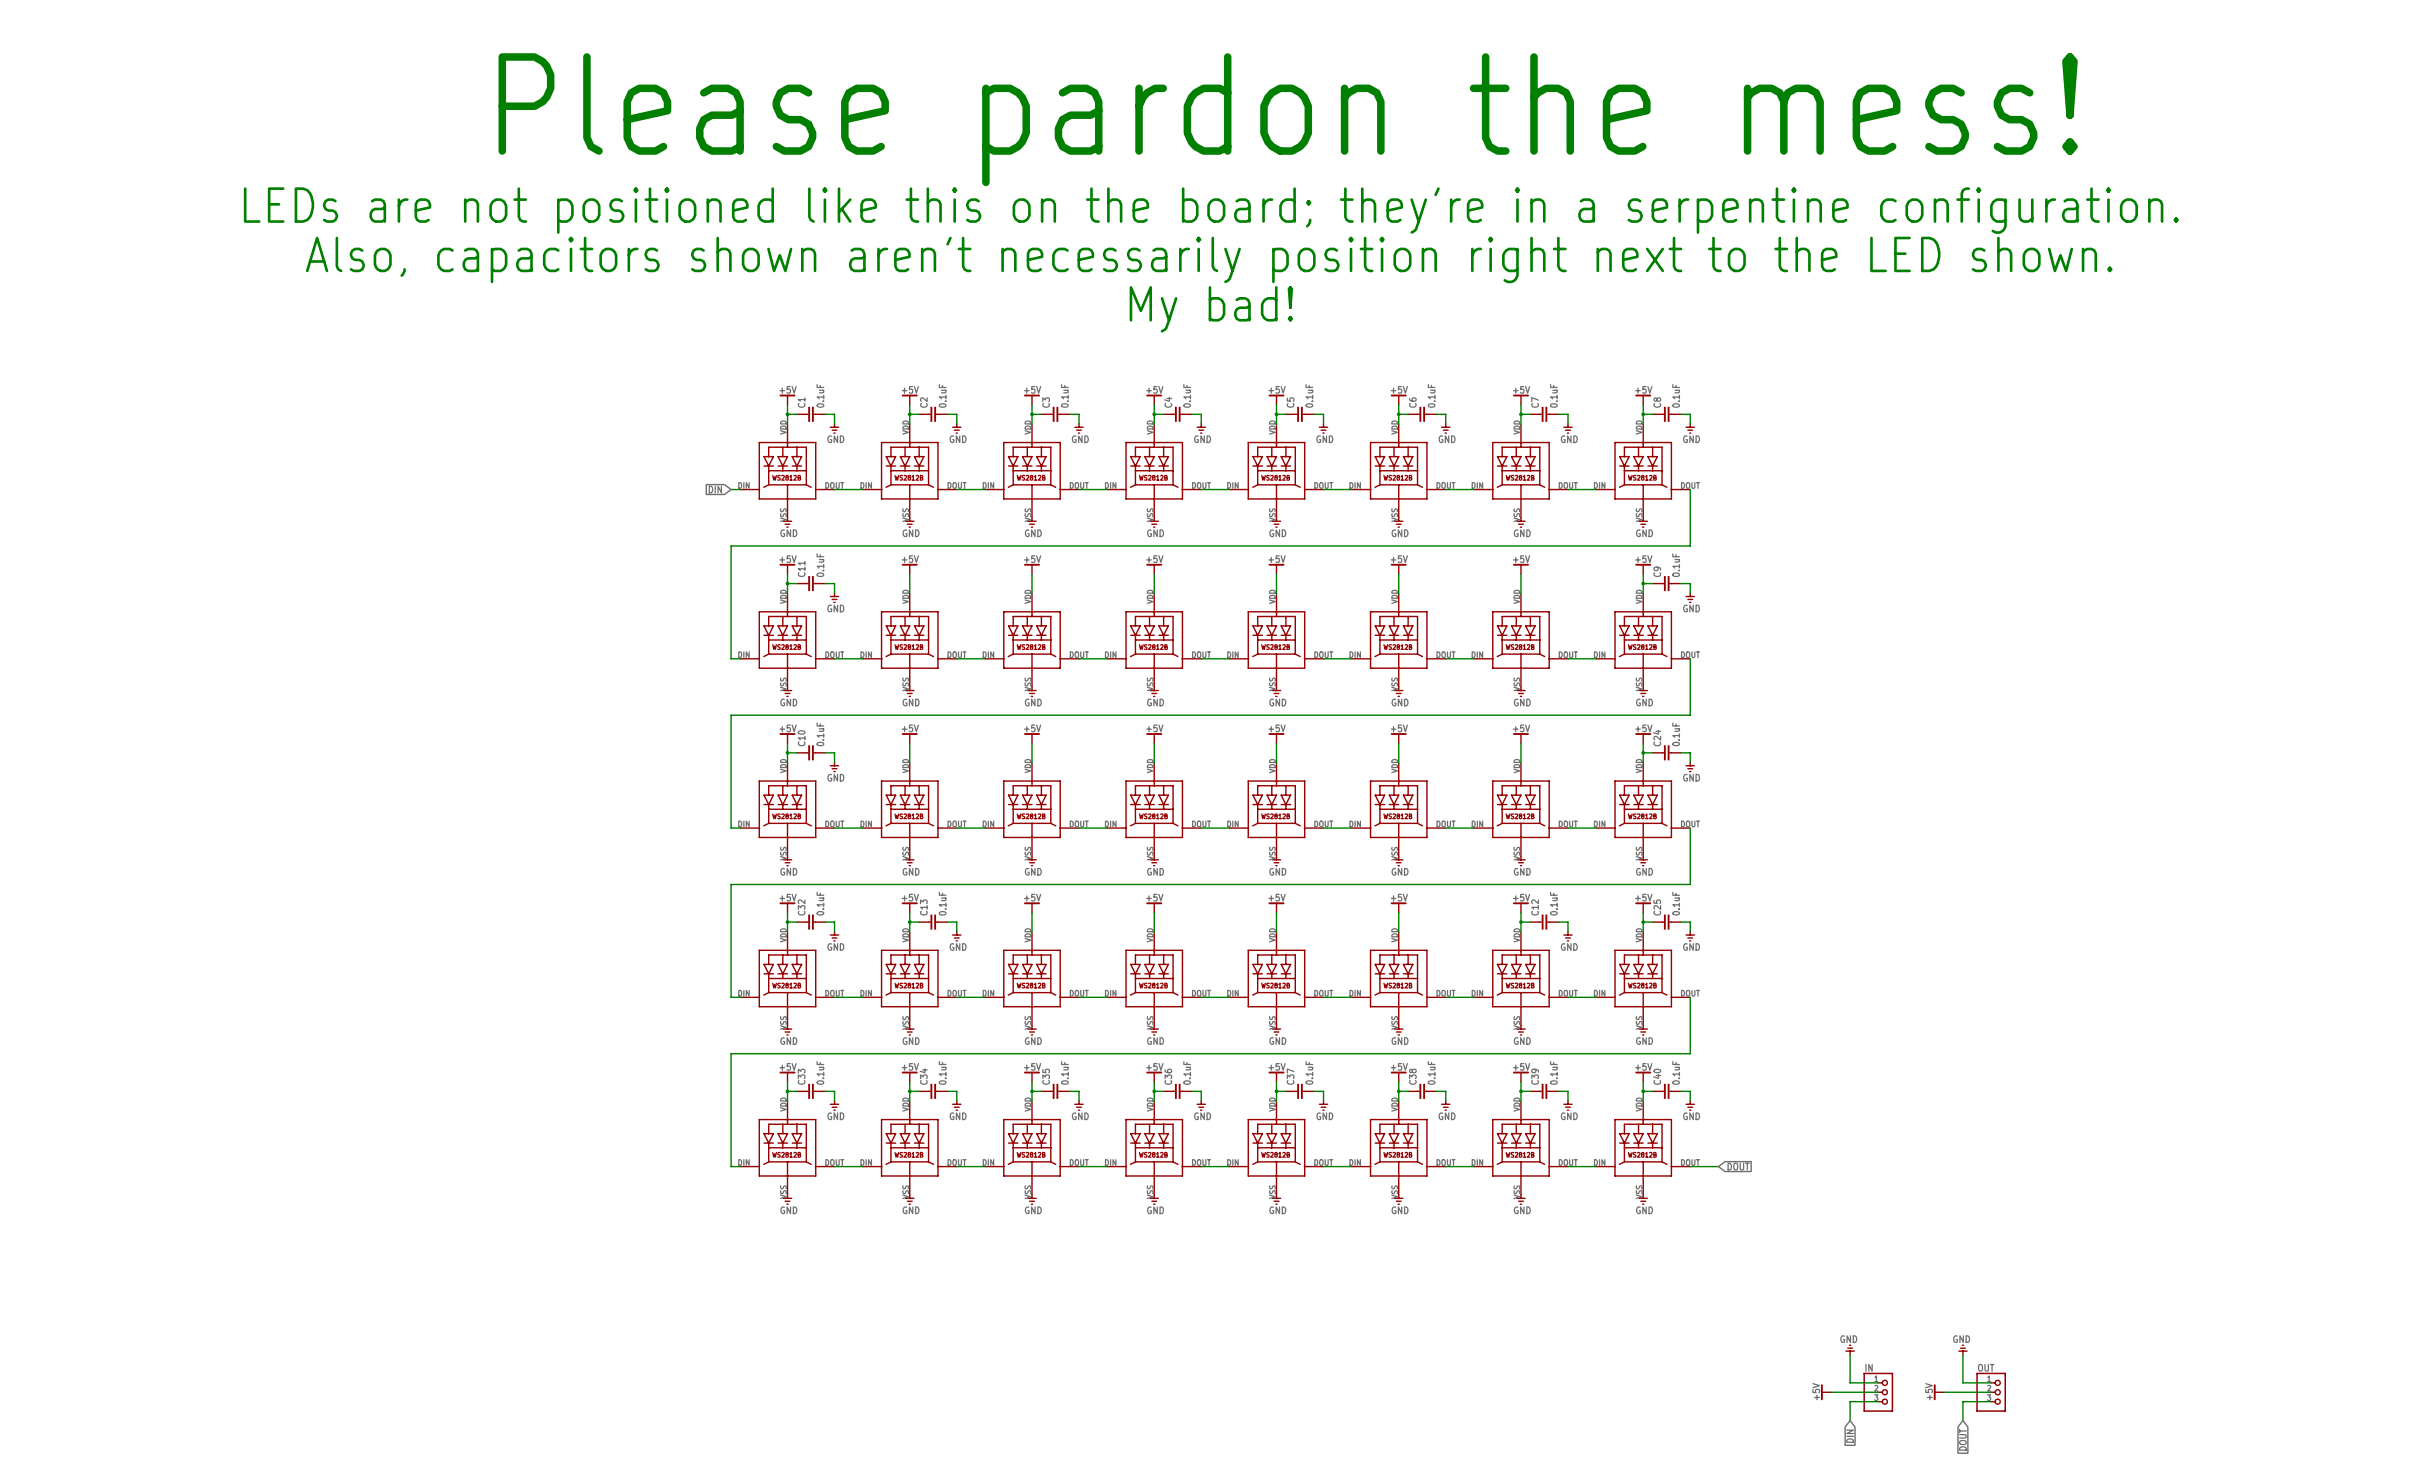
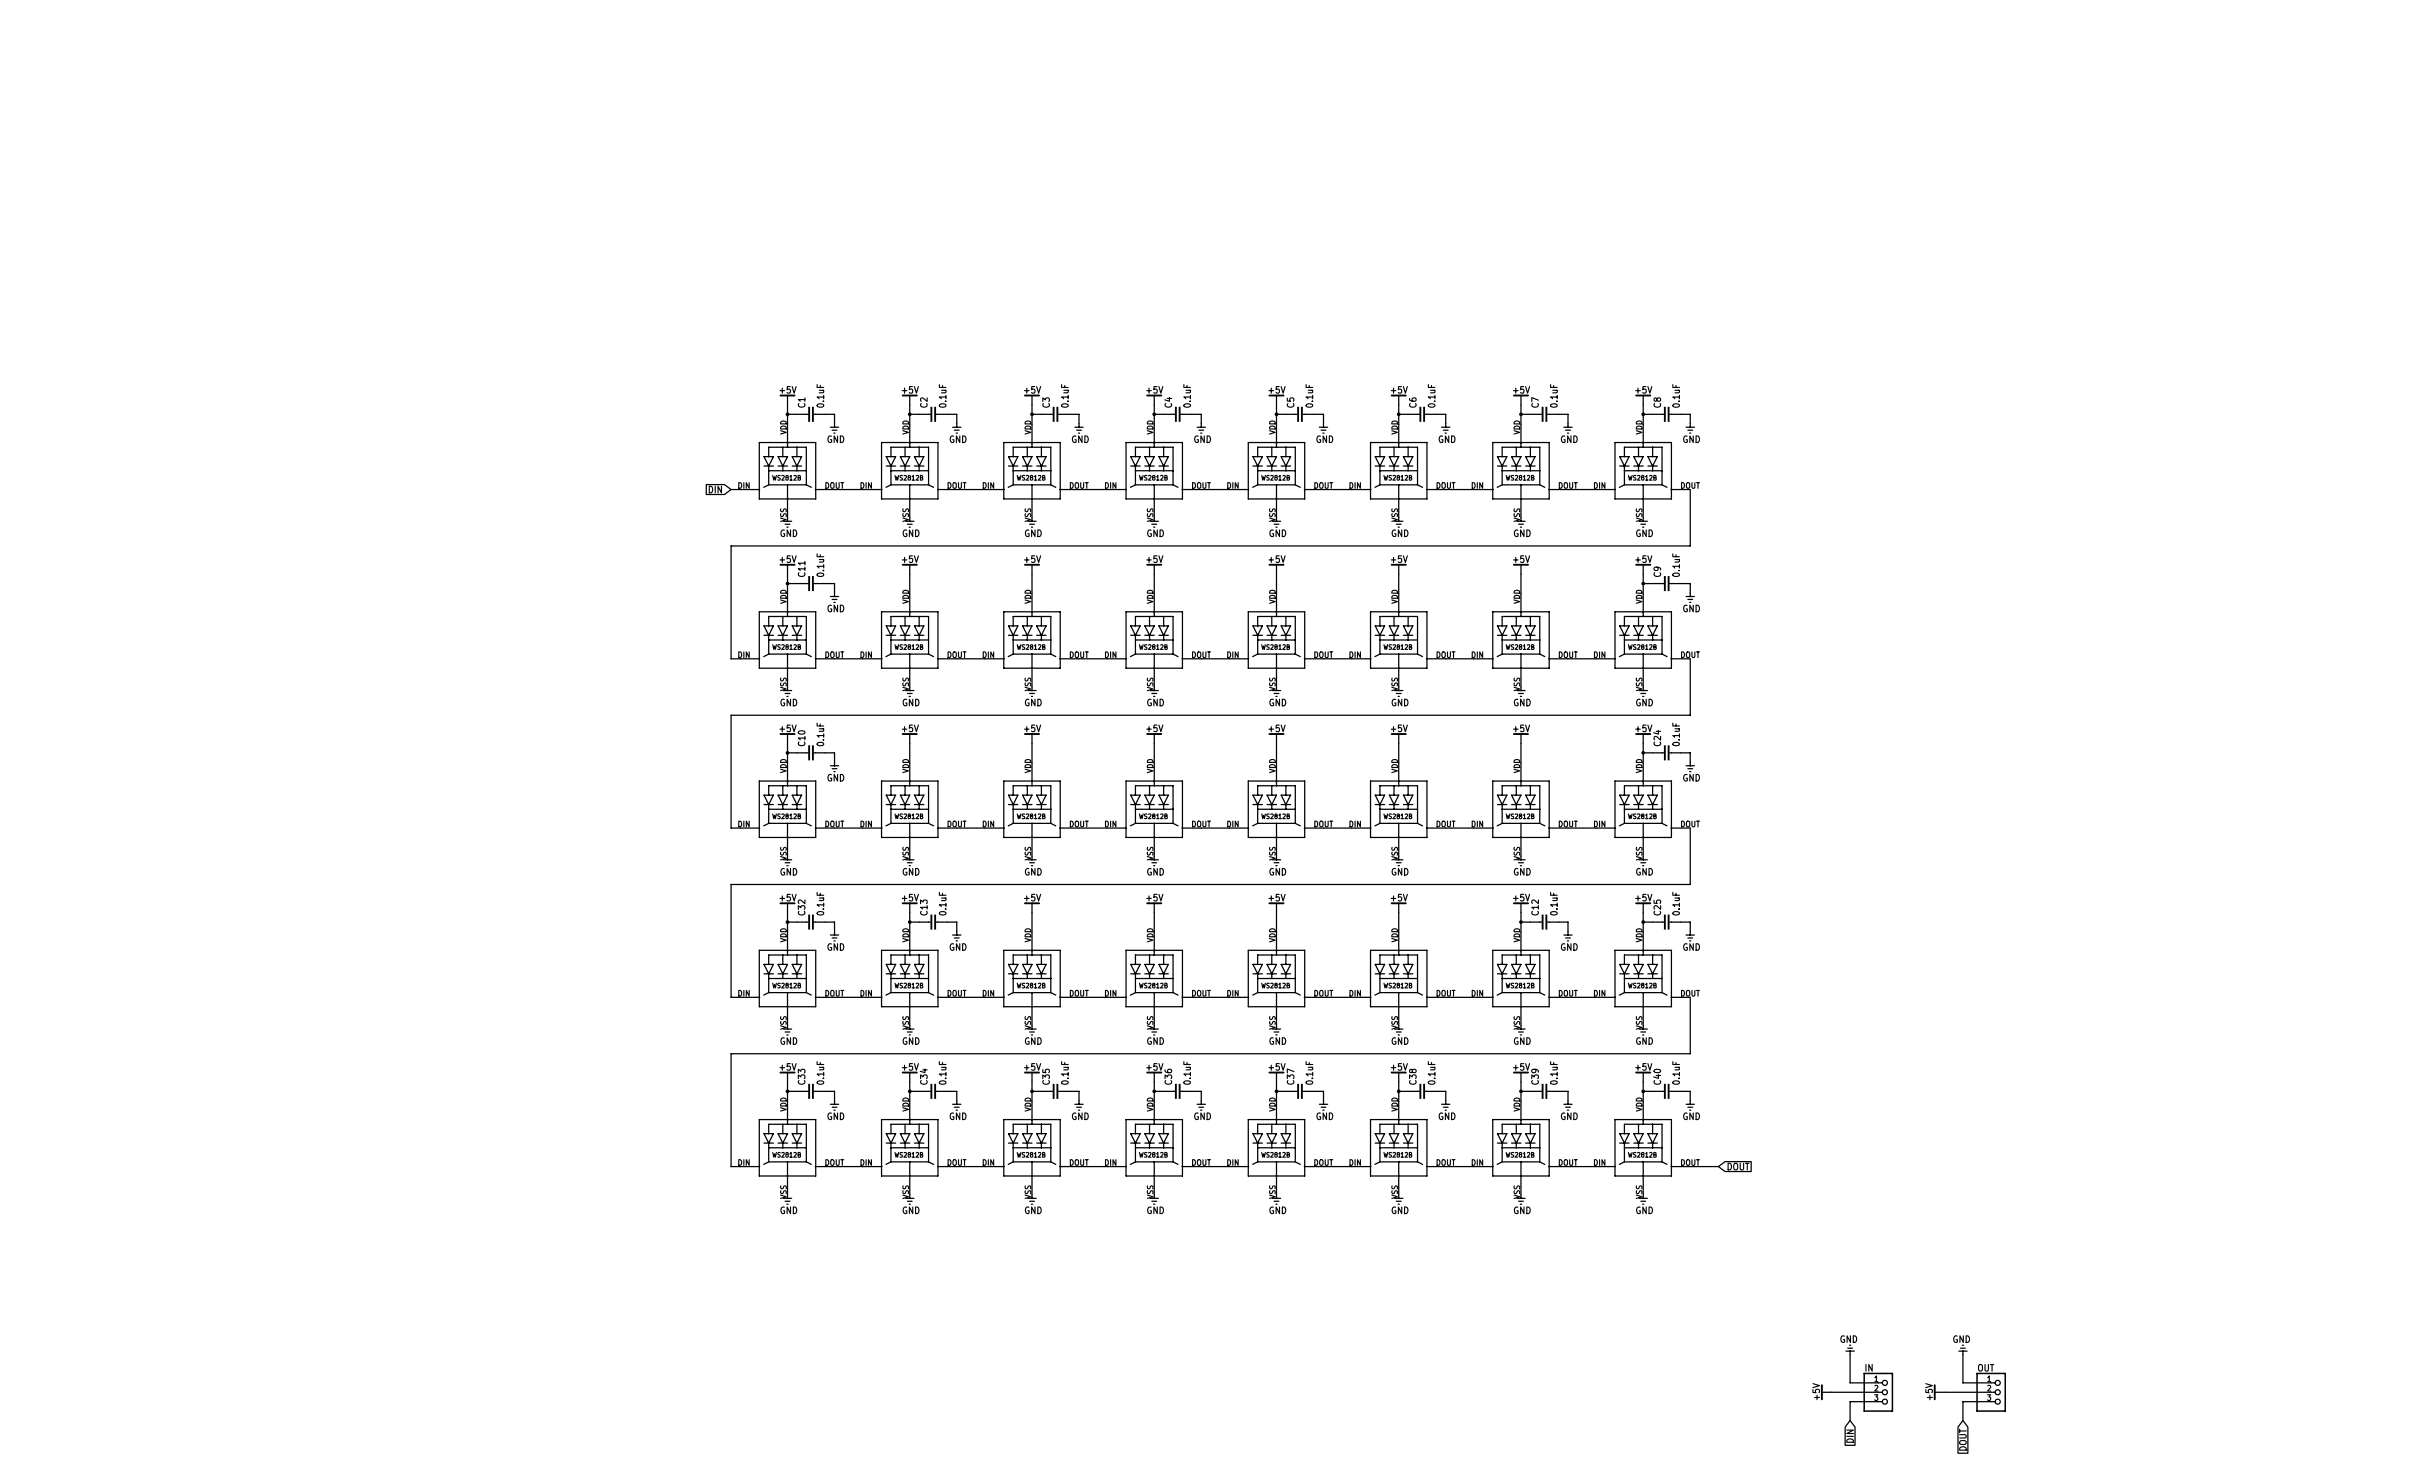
text: Please pardon the mess! (1288, 119) -> none
text: LEDs are not positioned like this on the board; they're in a serpentine configuration. (1211, 210) -> none
text: Also, capacitors shown aren't necessarily position right next to the LED shown. (1209, 259) -> none
text: My bad! (1211, 309) -> none

